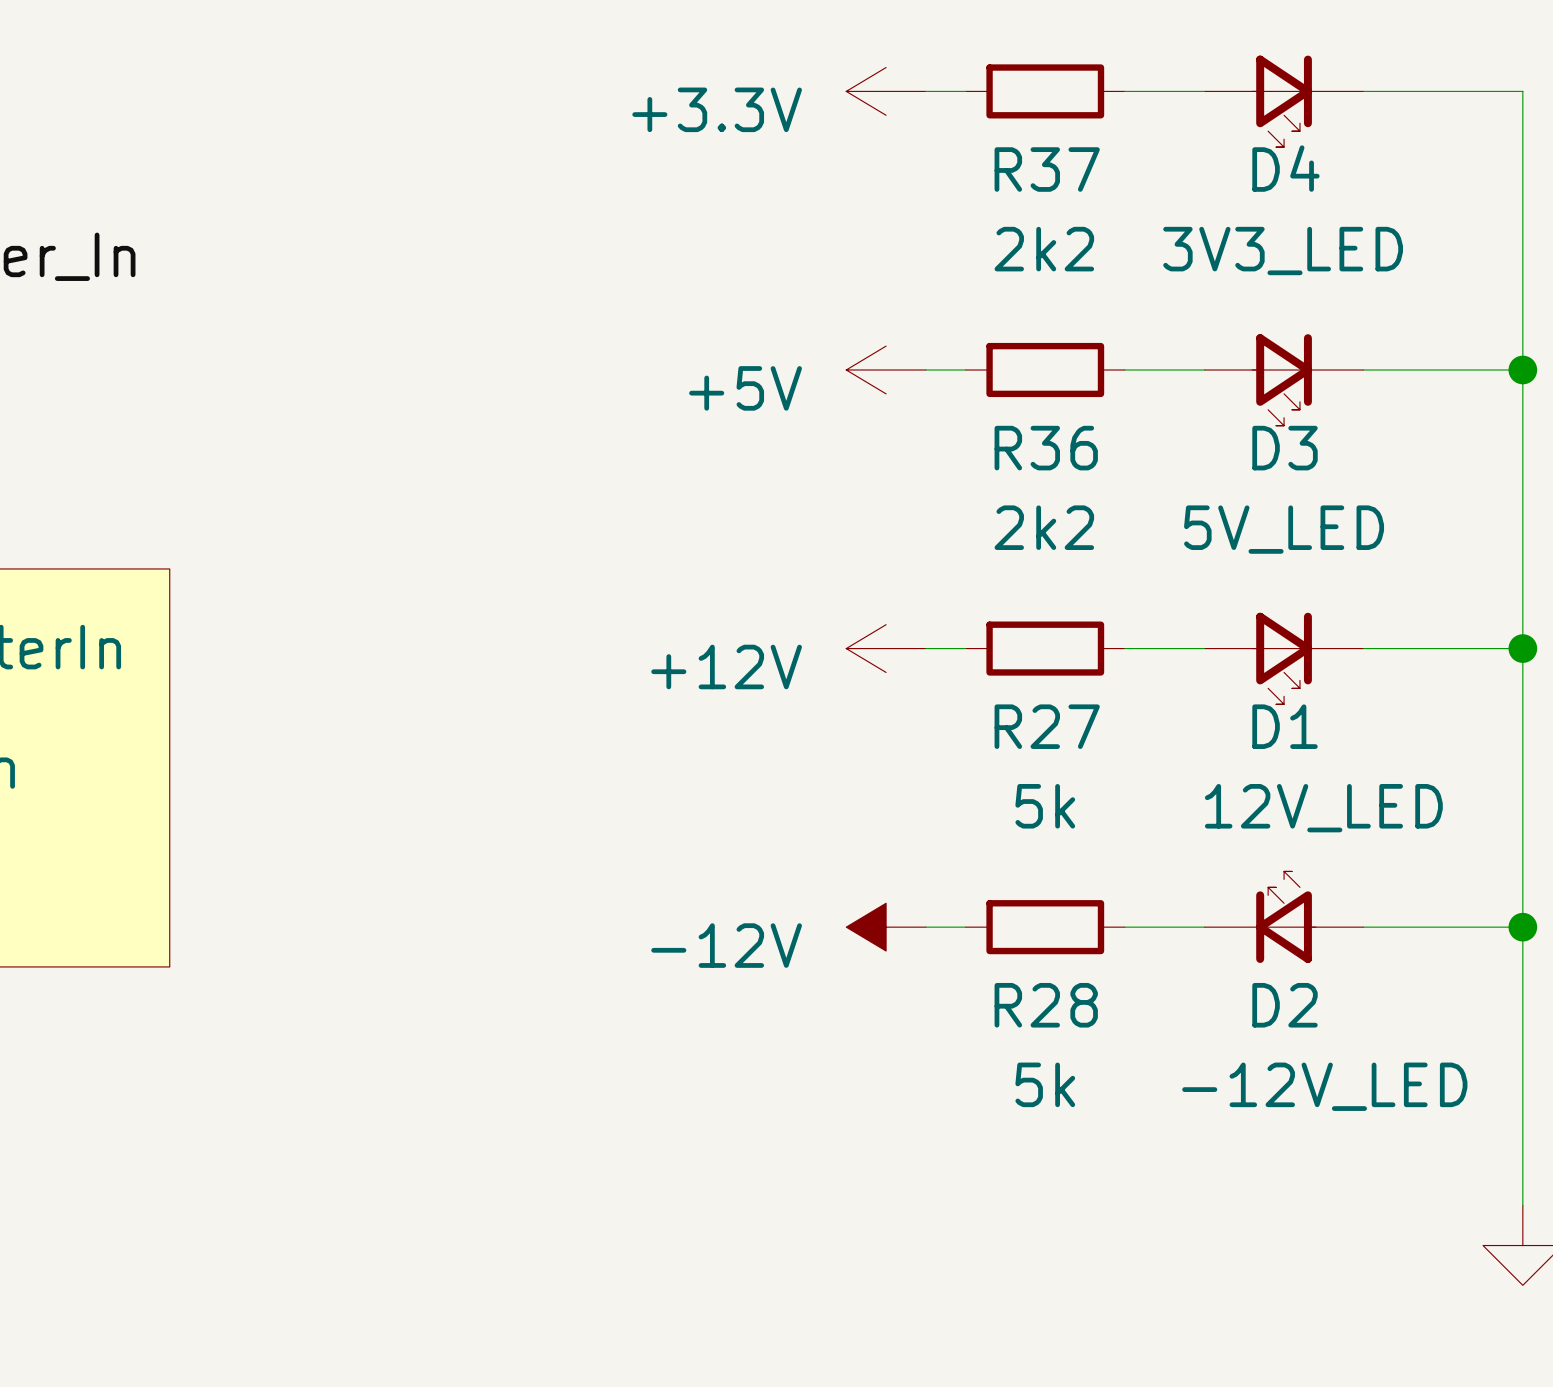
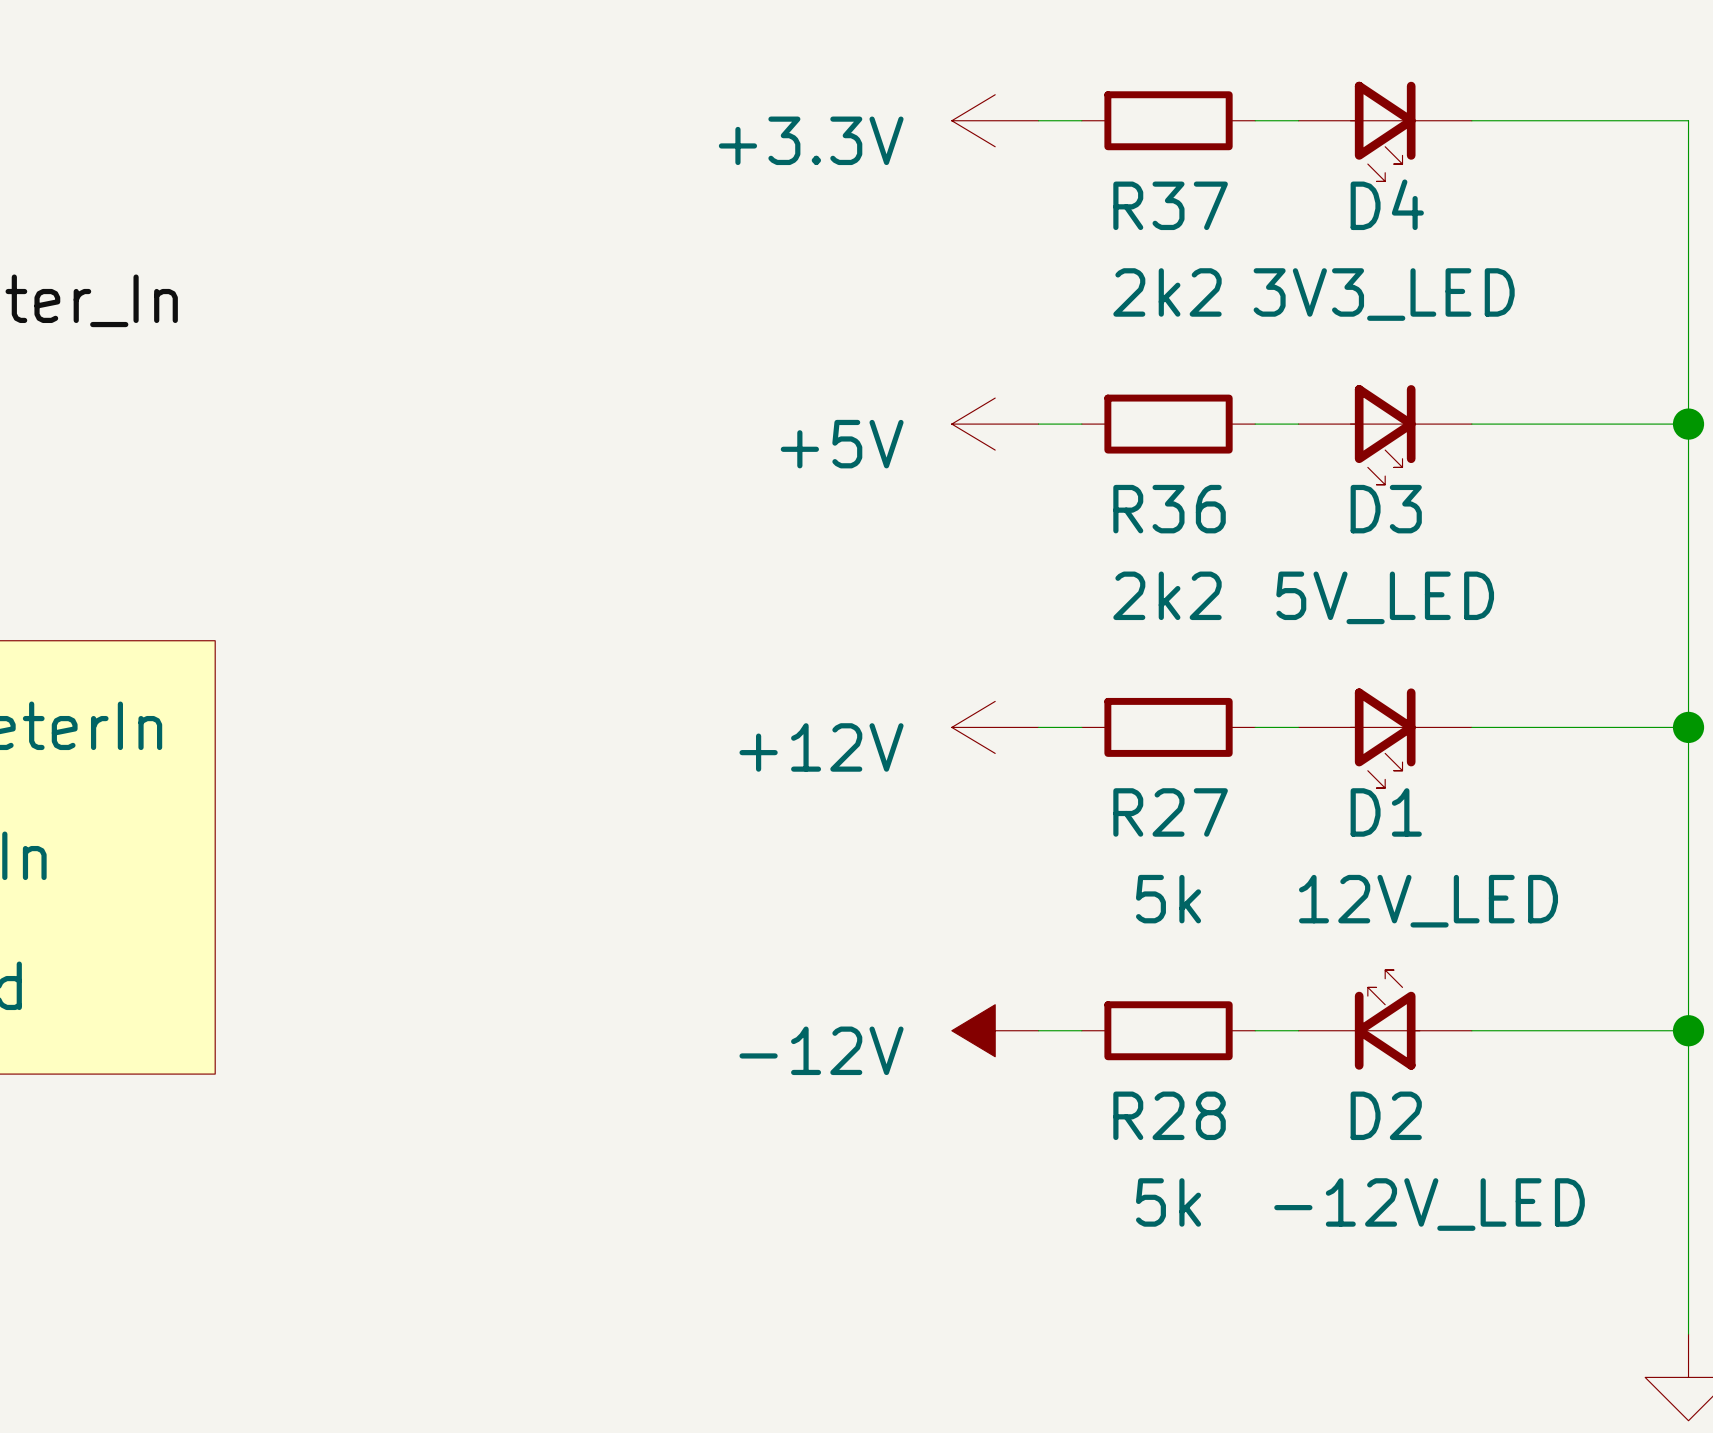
D4 position: (1284, 101) -> (1385, 131)
D3 position: (1284, 379) -> (1385, 434)
D1 position: (1284, 658) -> (1385, 738)
D2 position: (1284, 917) -> (1385, 1019)

